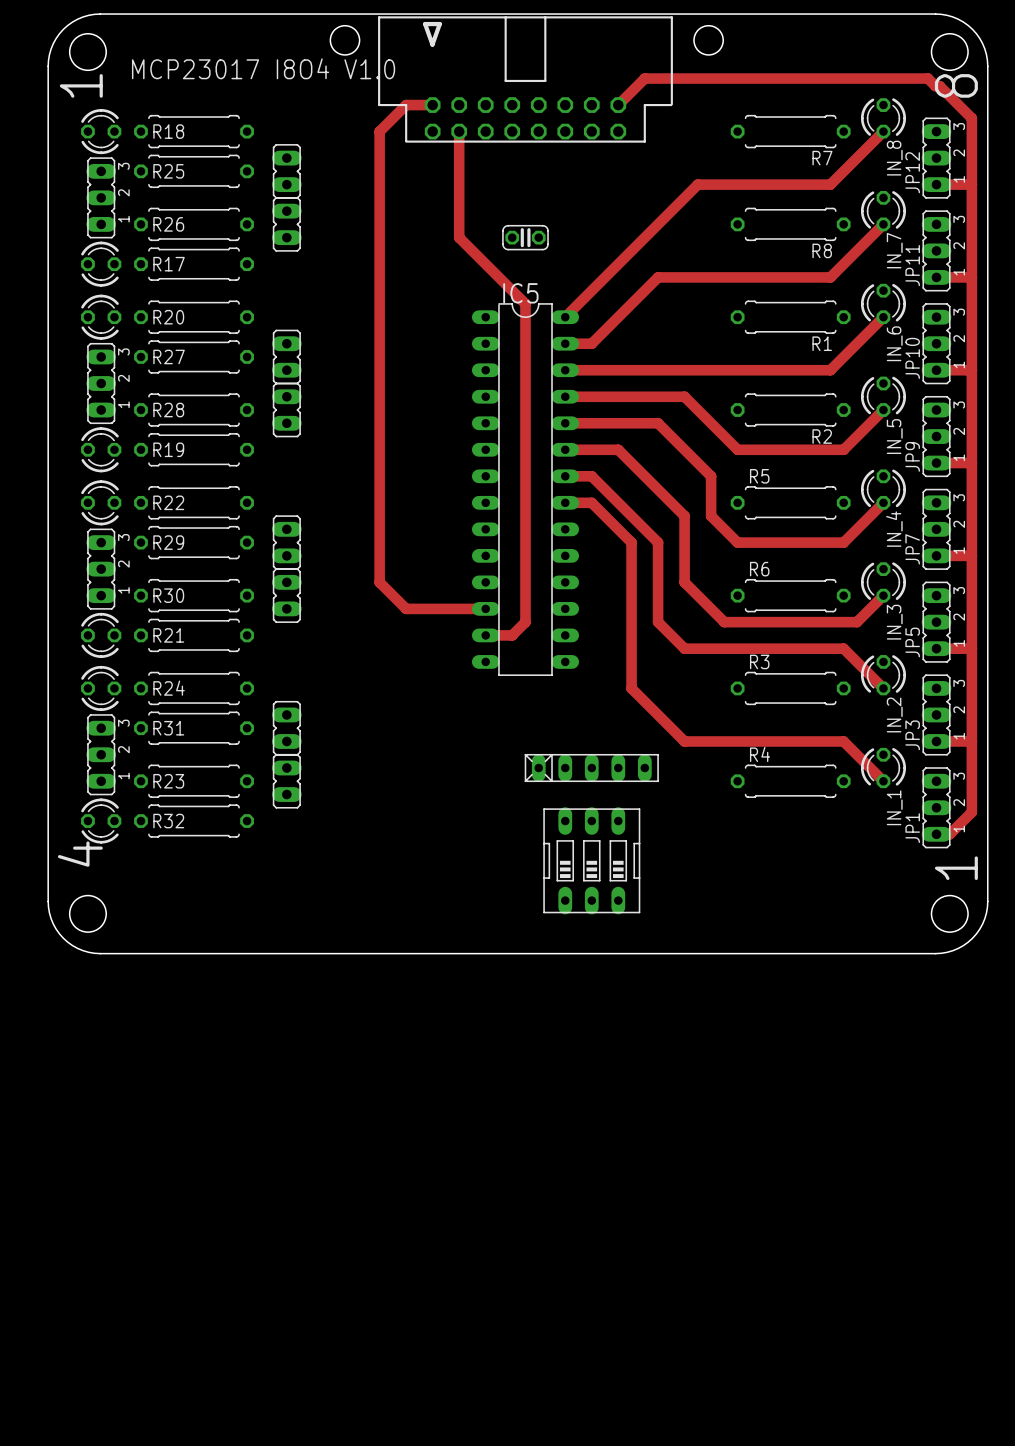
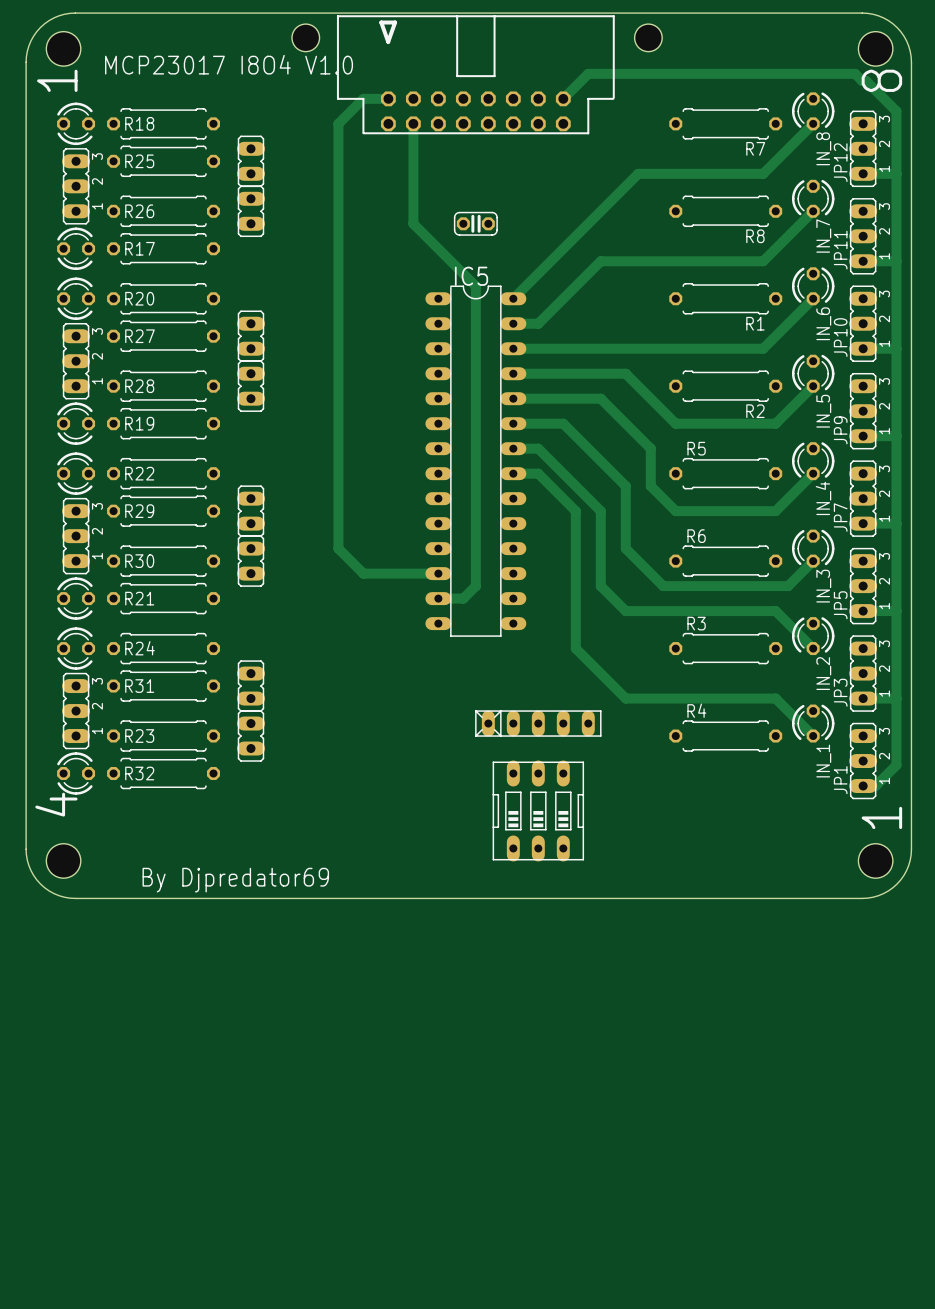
text: none -> By Djpredator69 (235, 880)

